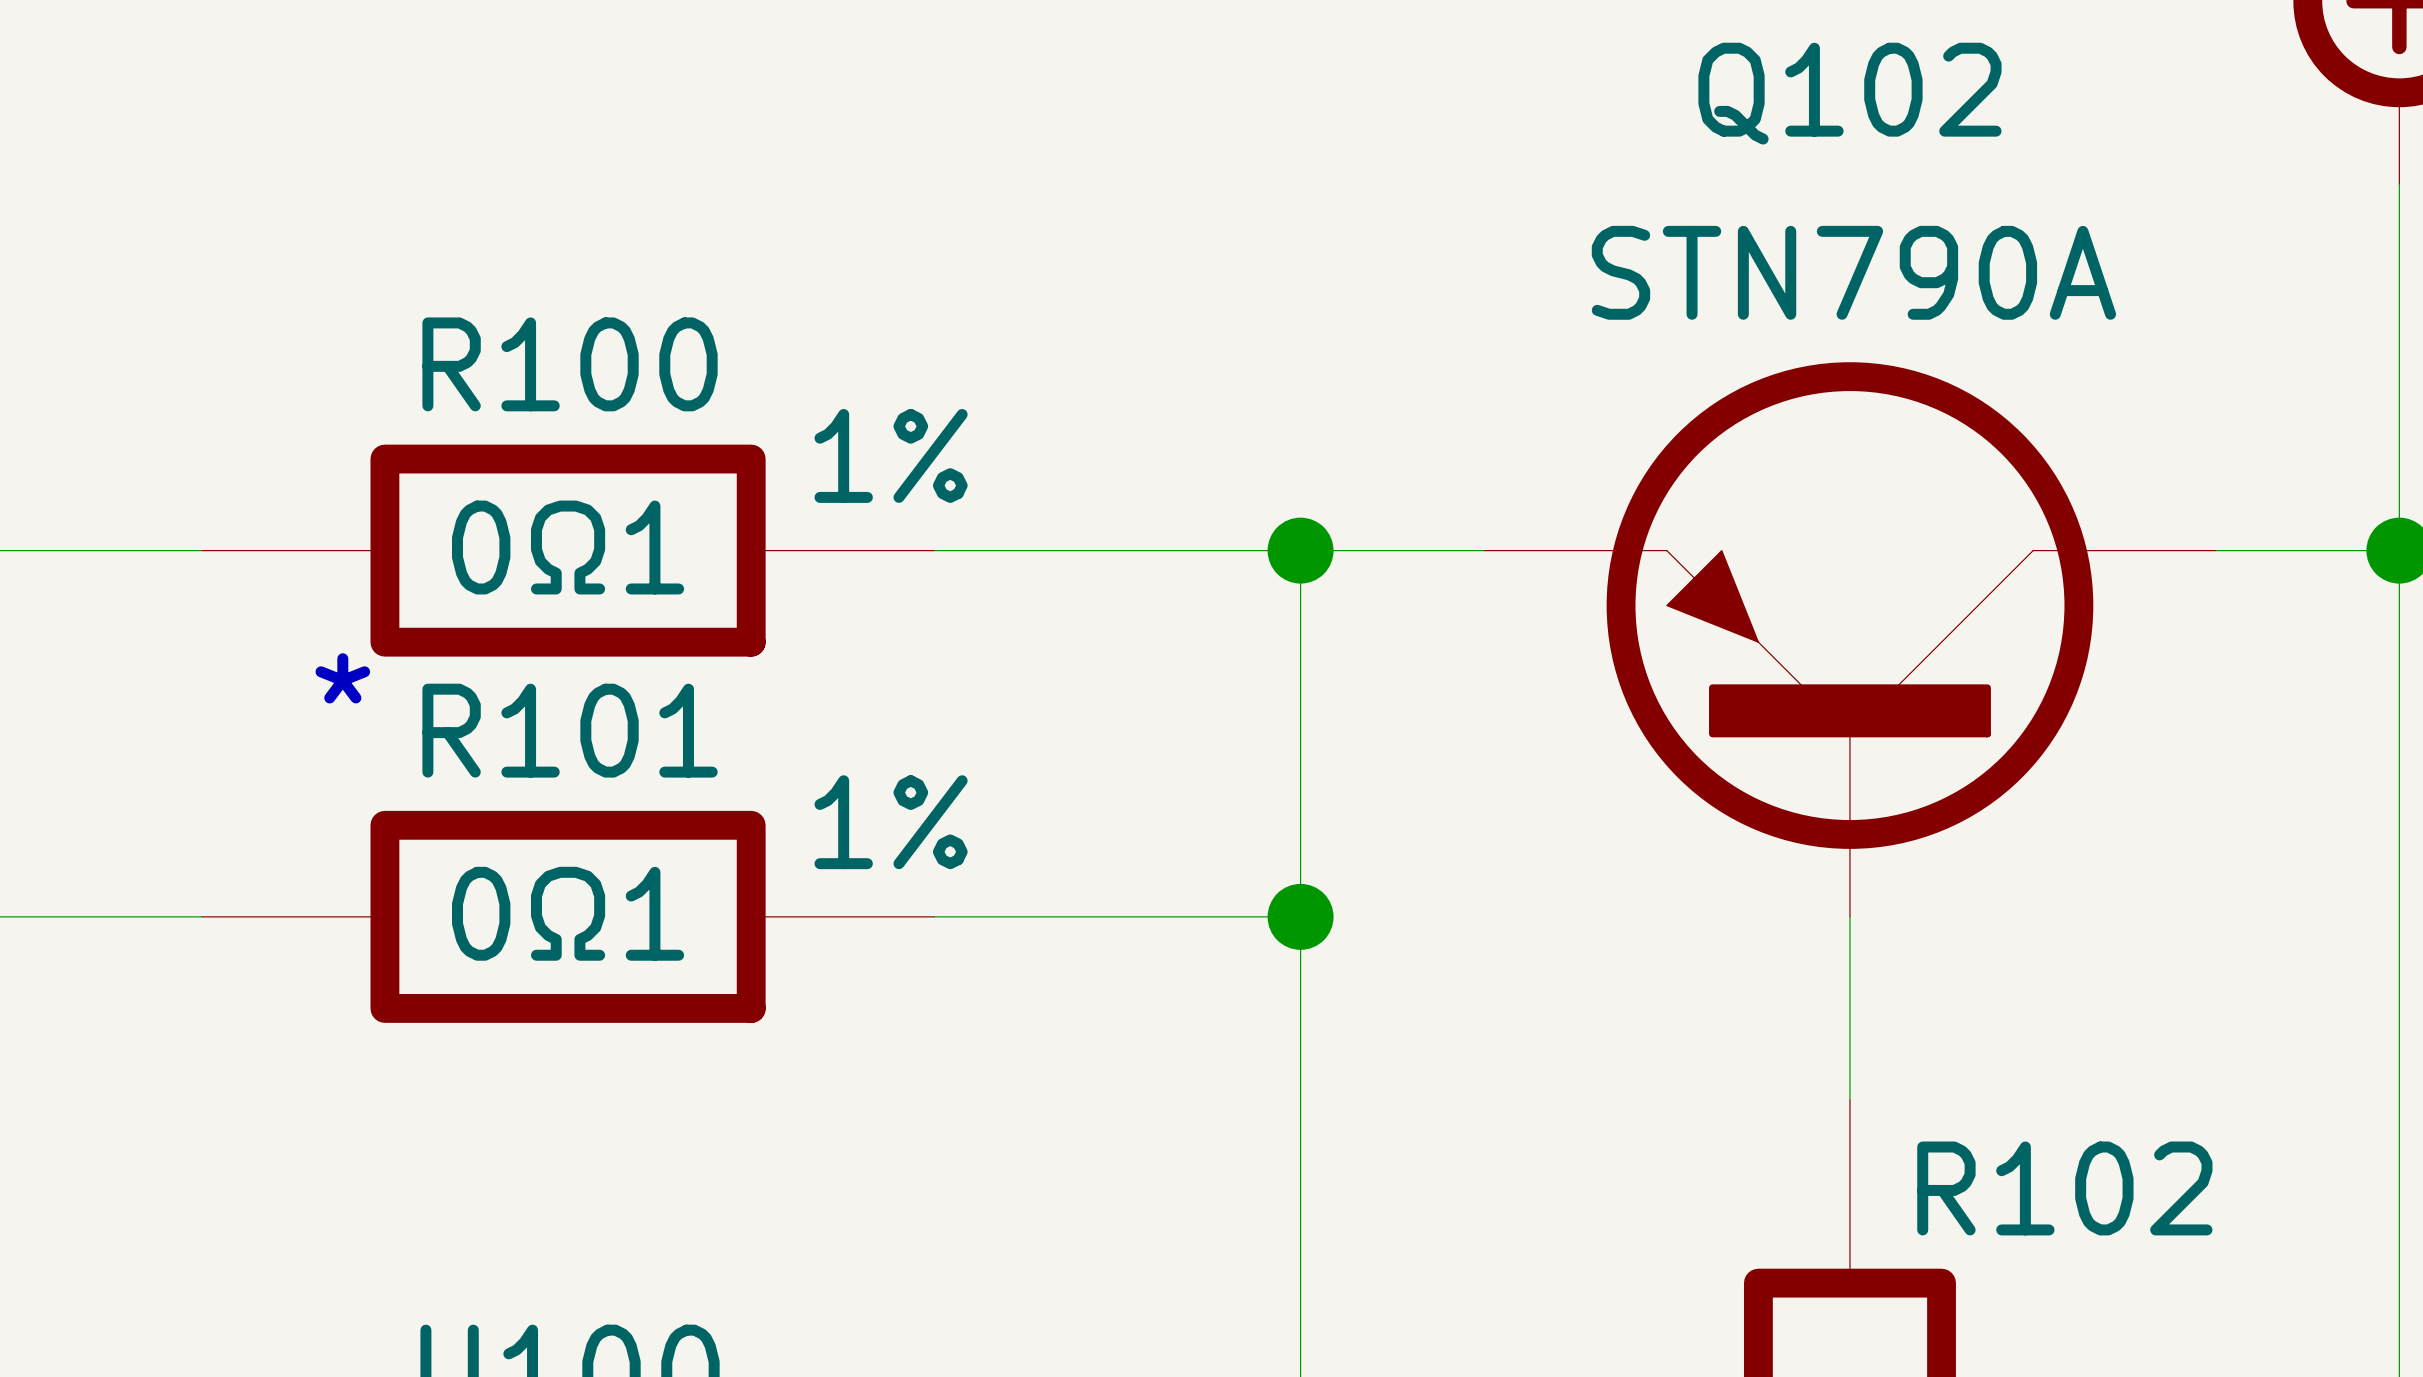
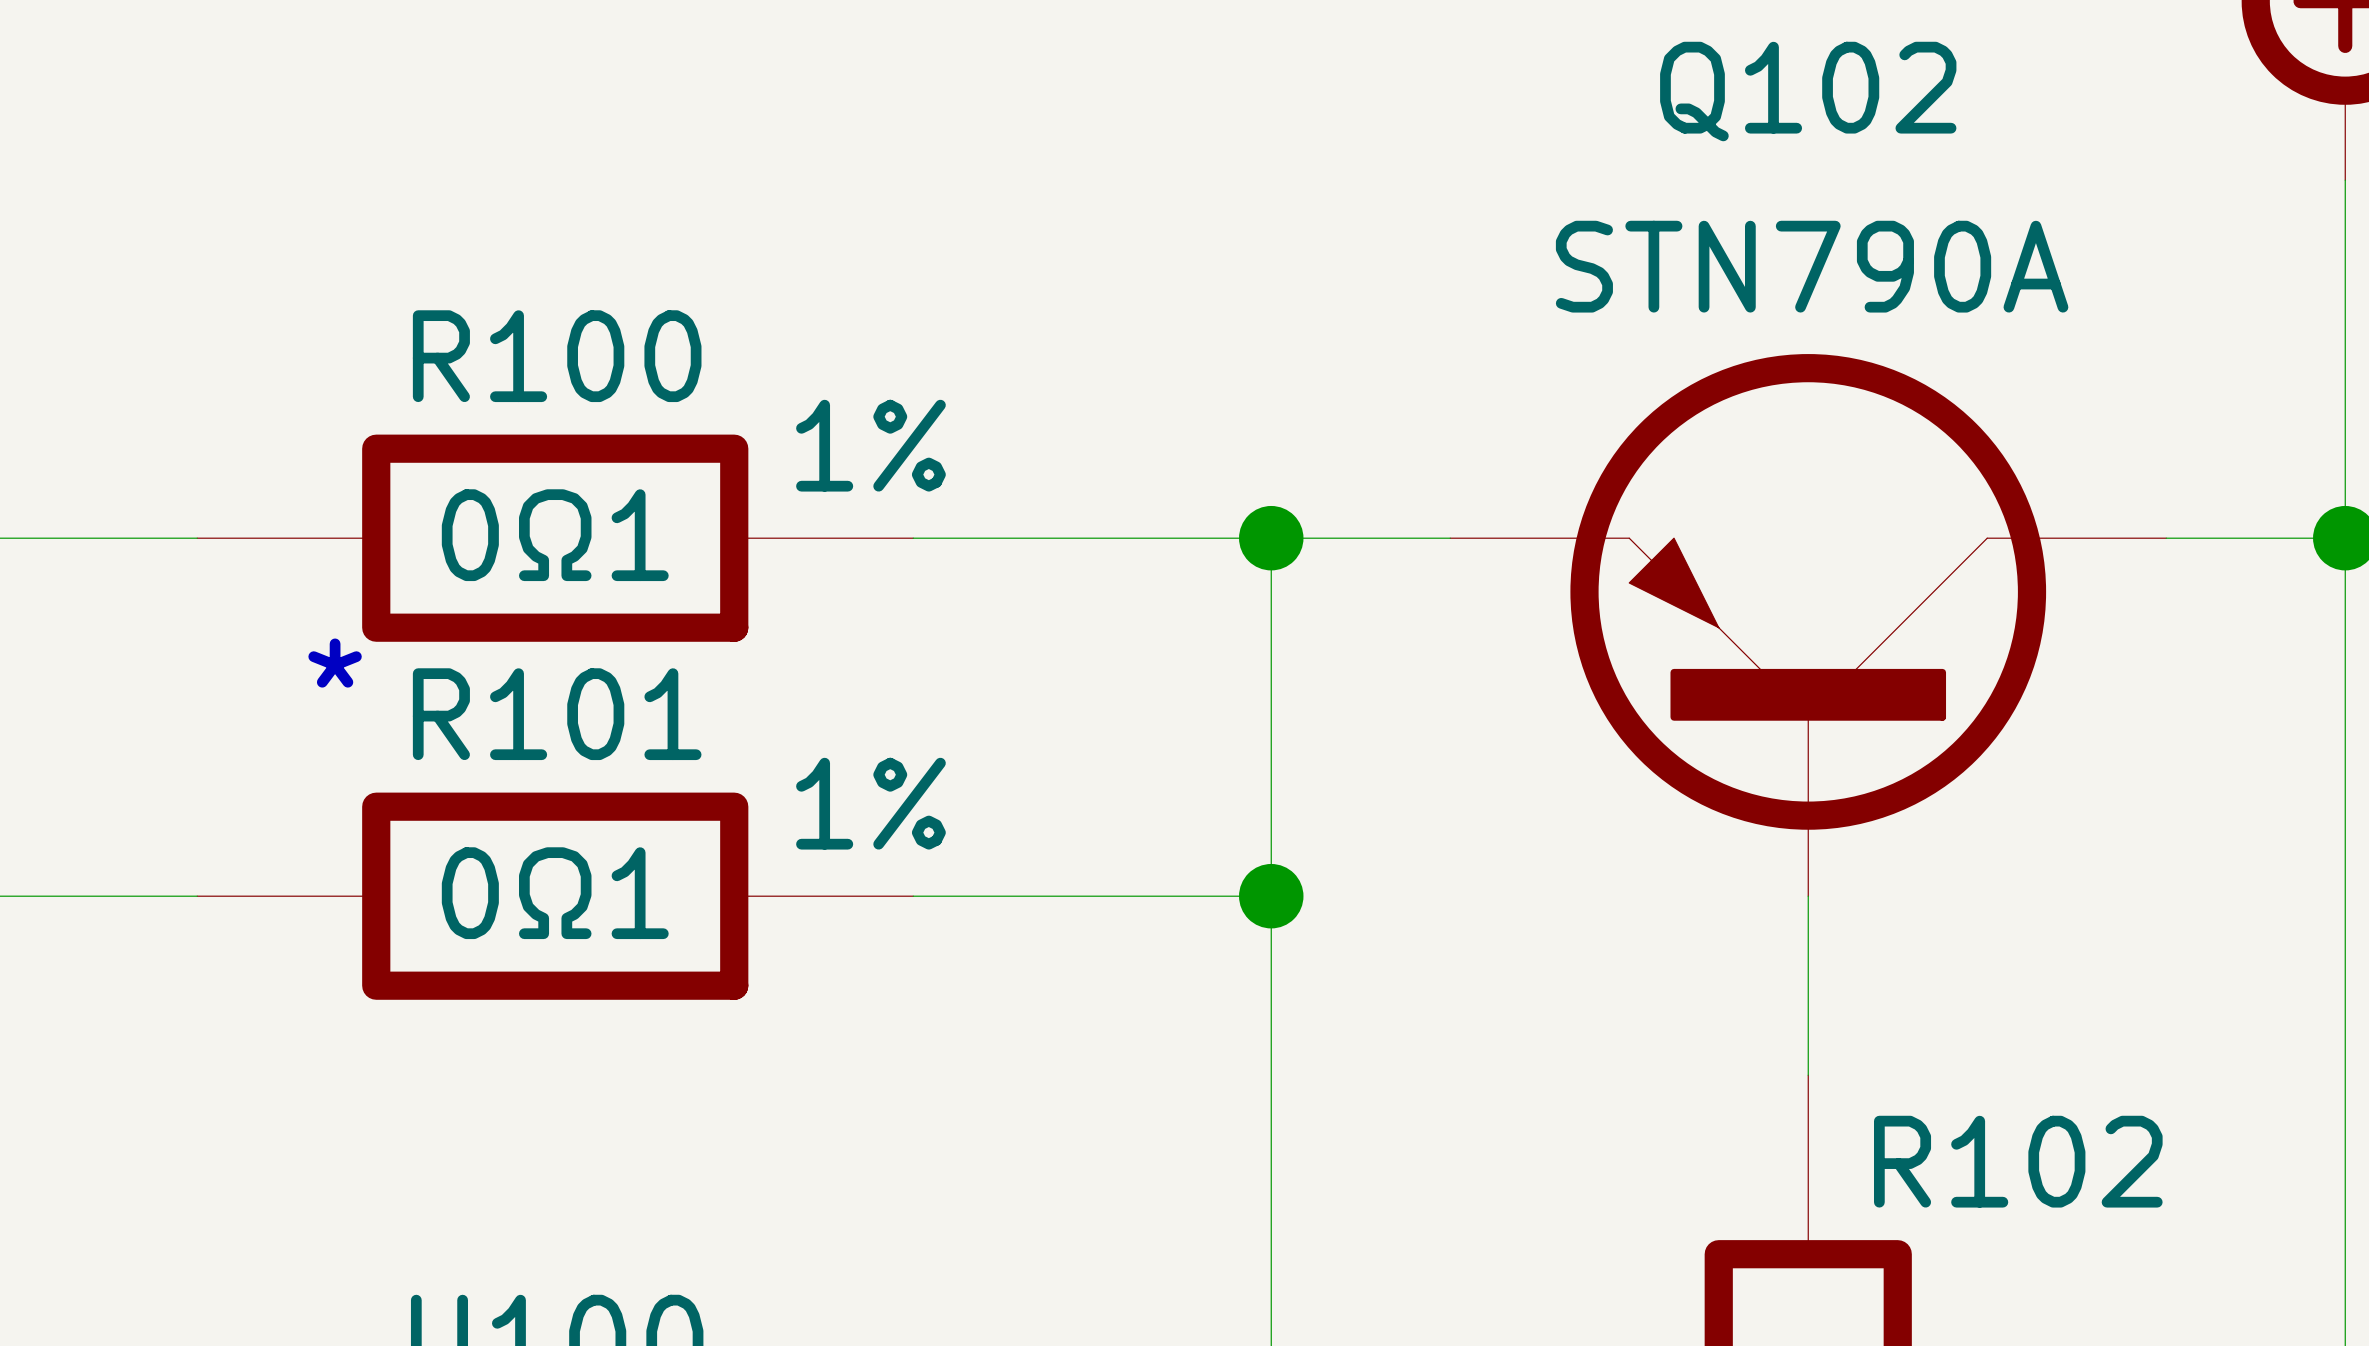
Q102 symbol: [1483, 362, 2217, 917] -> [1450, 354, 2167, 897]

